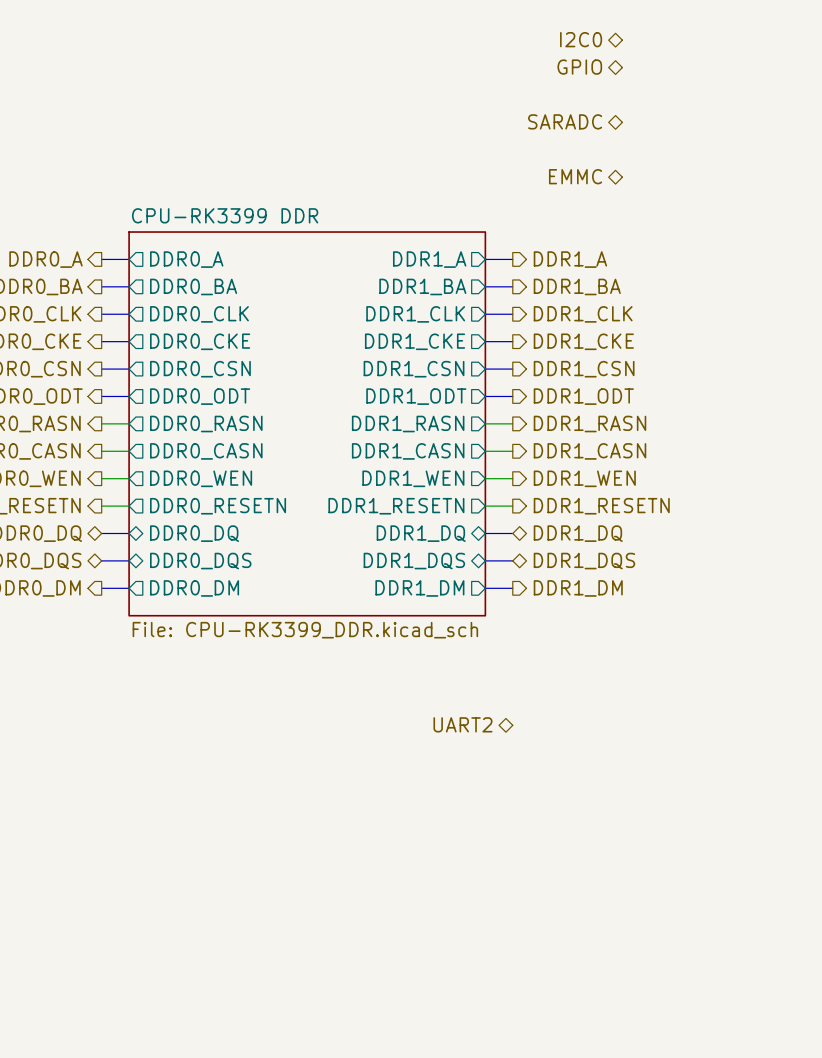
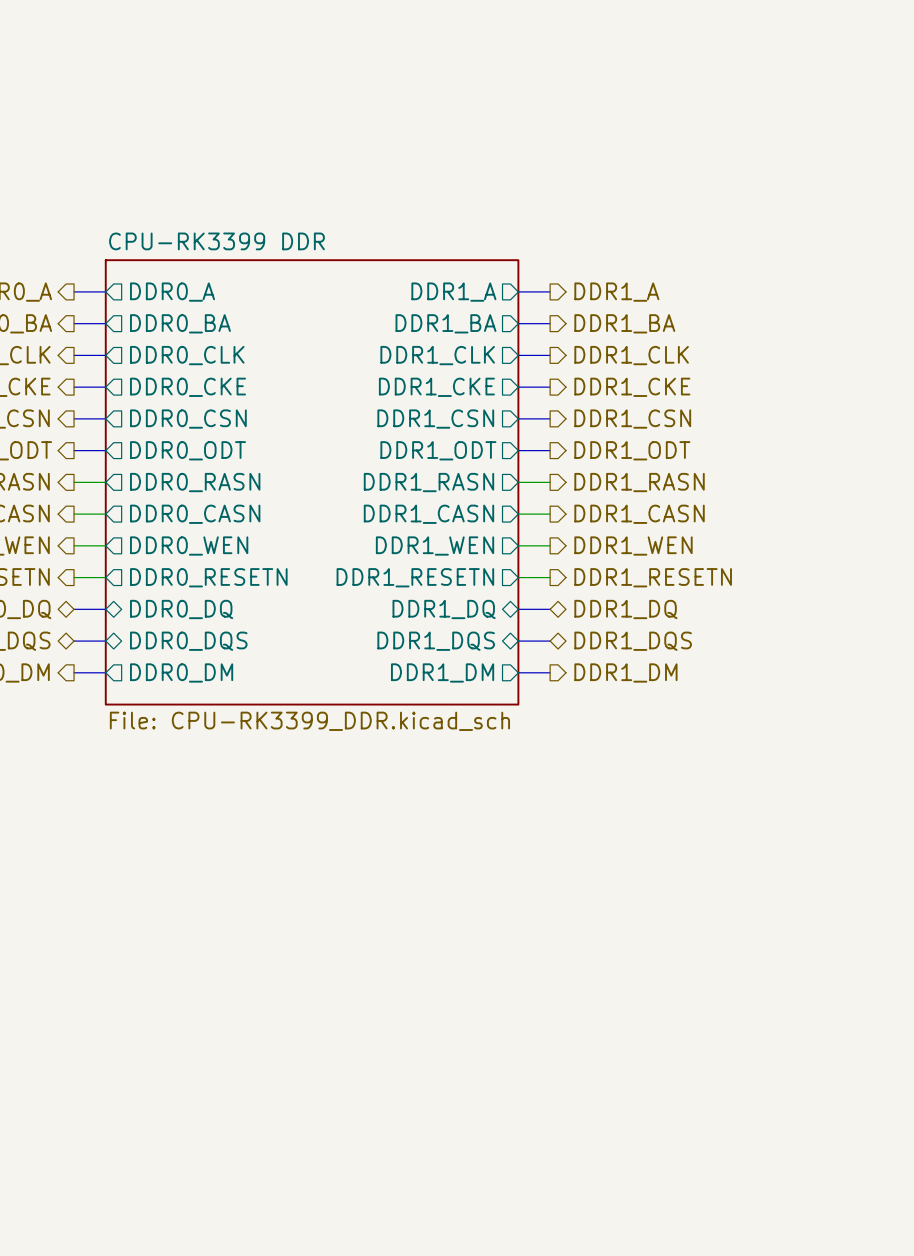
hierarchical label: I2C0 (581, 39) -> none
hierarchical label: GPIO (579, 67) -> none
hierarchical label: SARADC (565, 121) -> none
hierarchical label: EMMC (575, 176) -> none
hierarchical label: UART2 (462, 724) -> none

